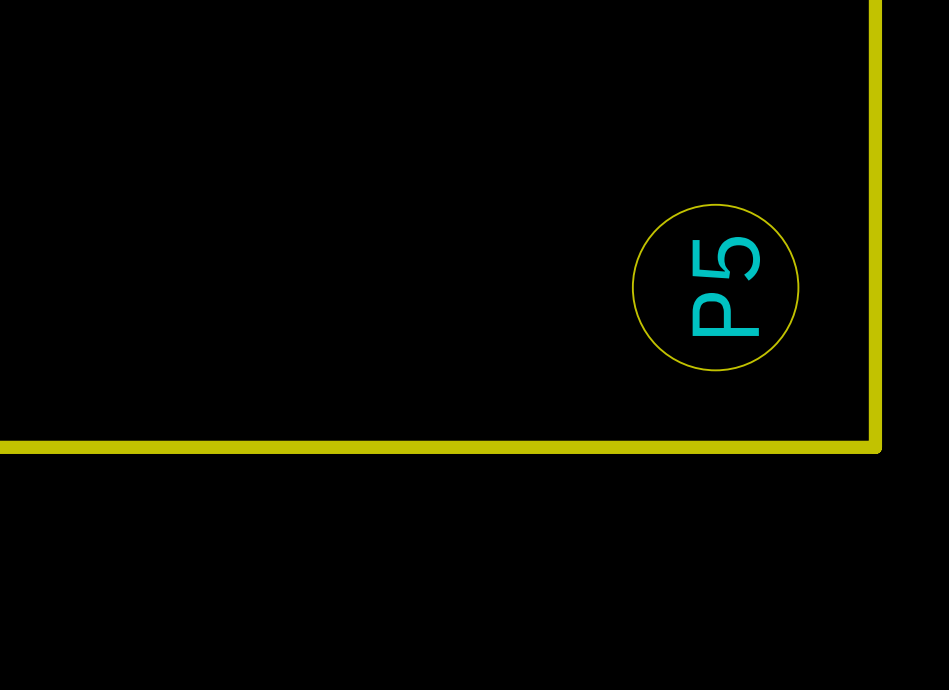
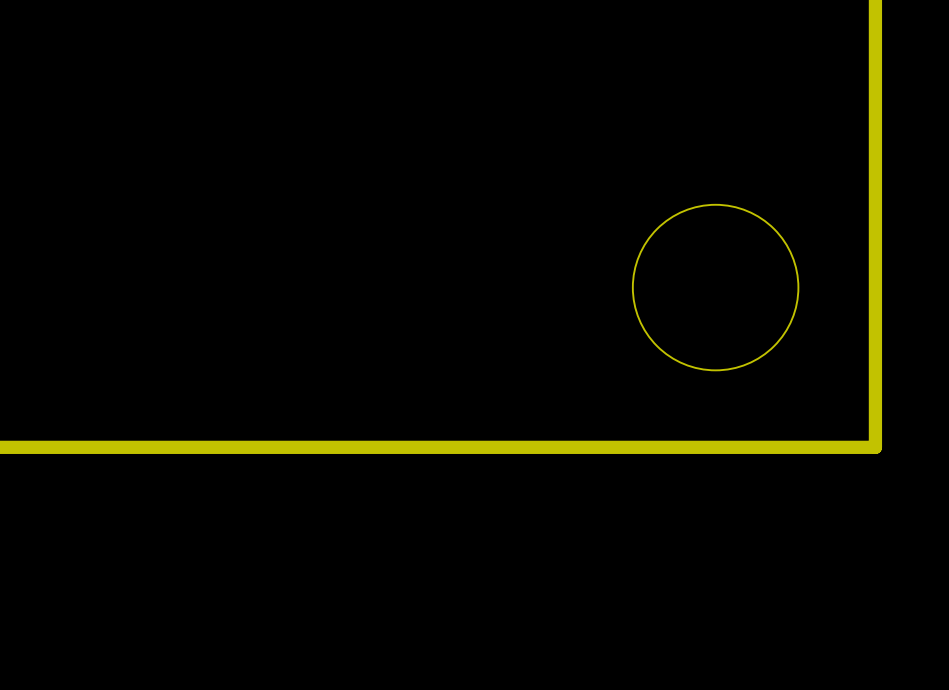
P5 name: P5 (726, 286) -> none

